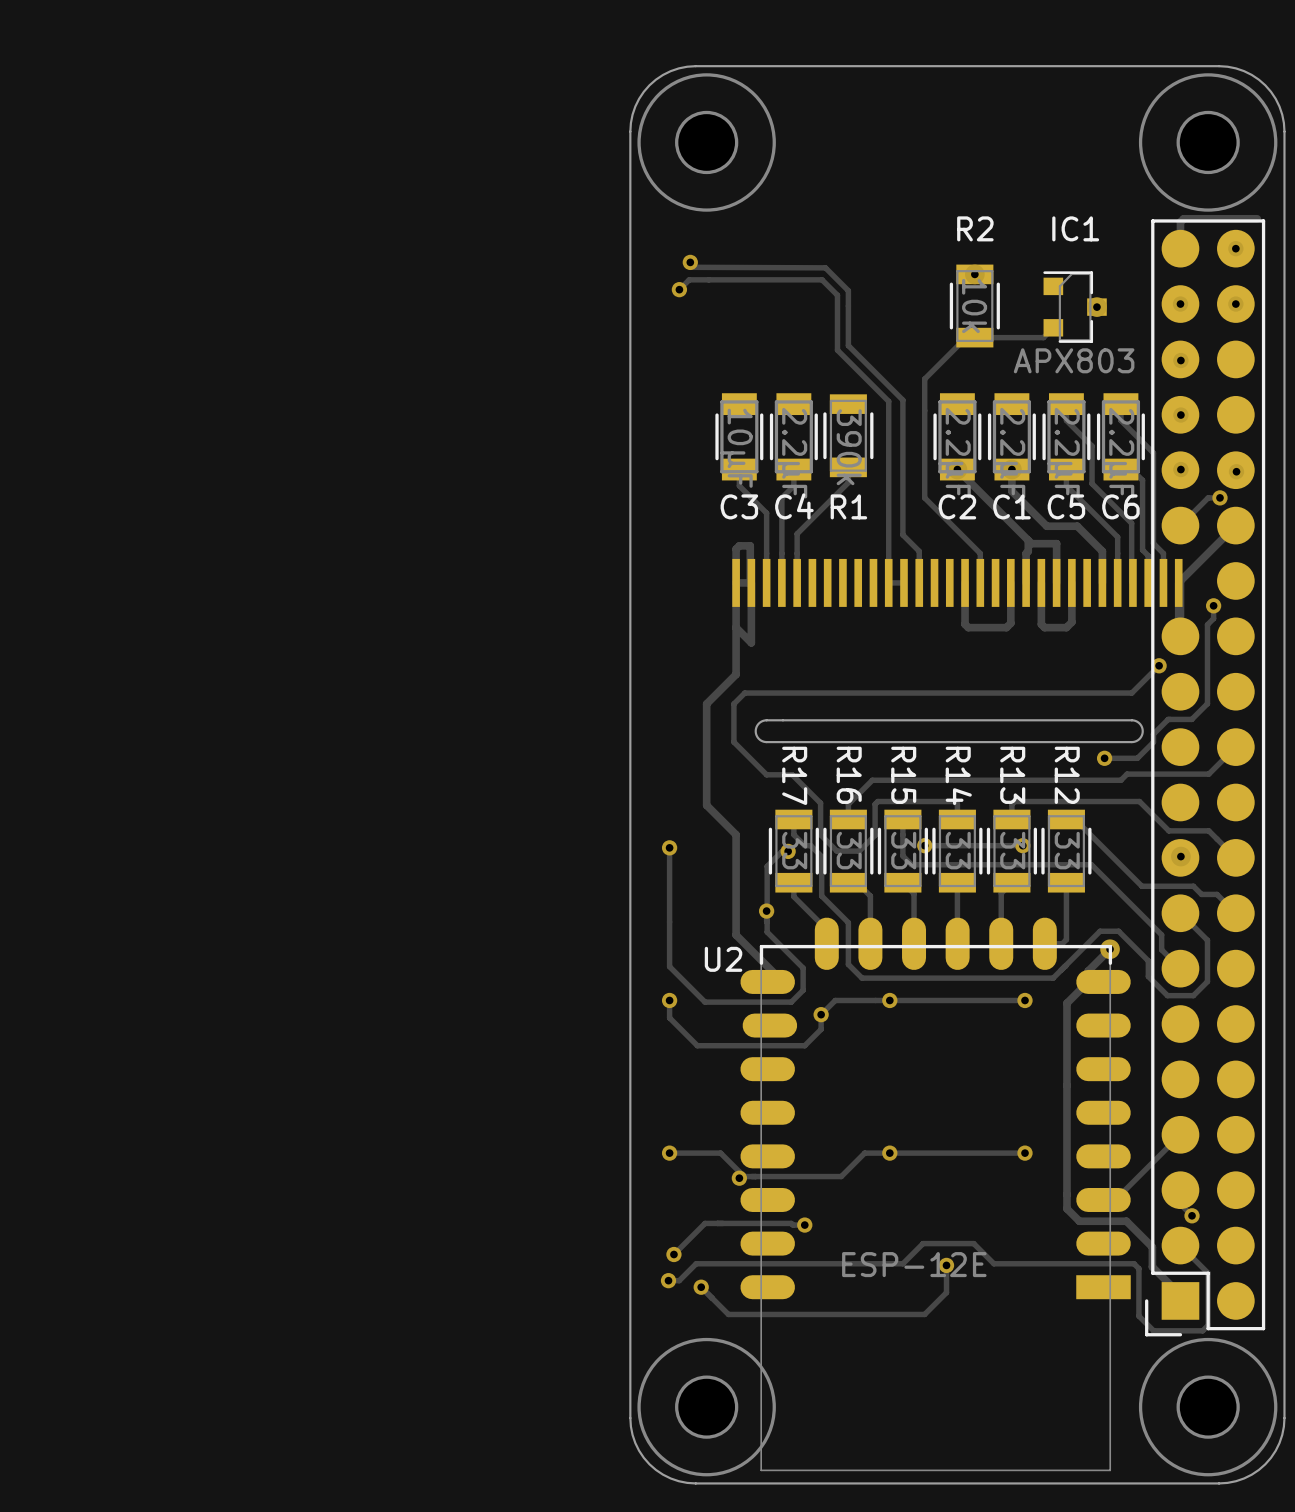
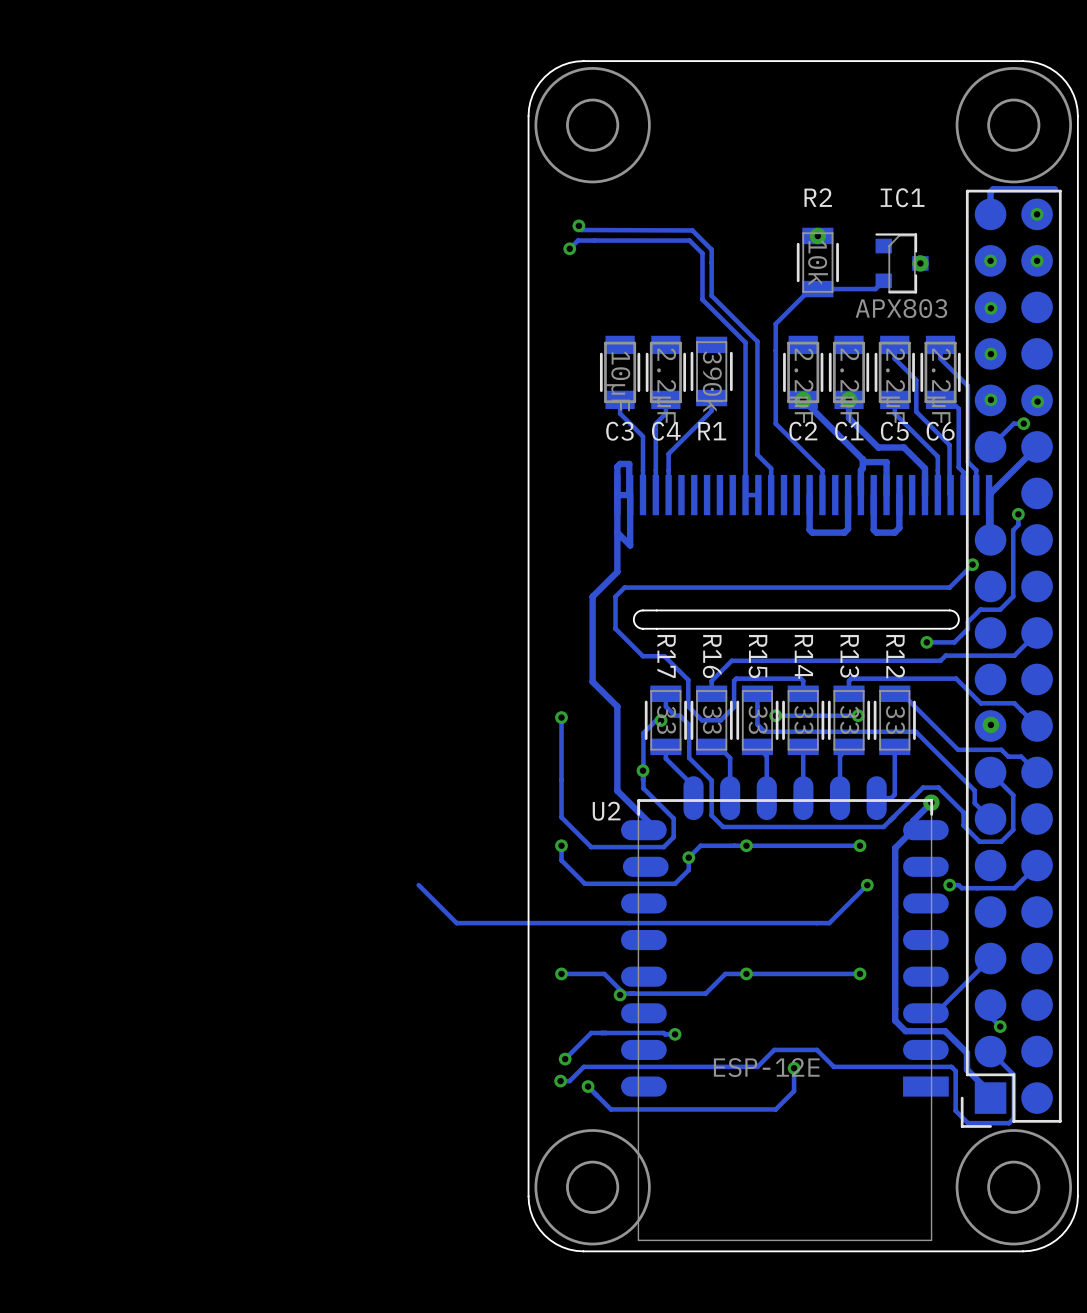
track: none -> (1037, 865) (1014, 888) (961, 888) (958, 885) (949, 885)
track: none -> (867, 885) (829, 923) (456, 923) (418, 885)
via: none -> (867, 885)
via: none -> (949, 885)

